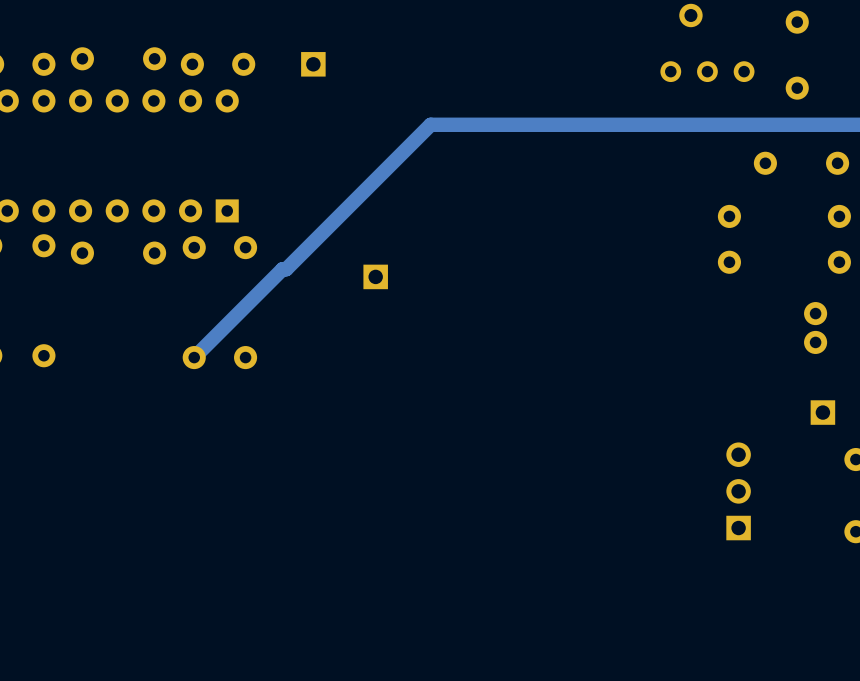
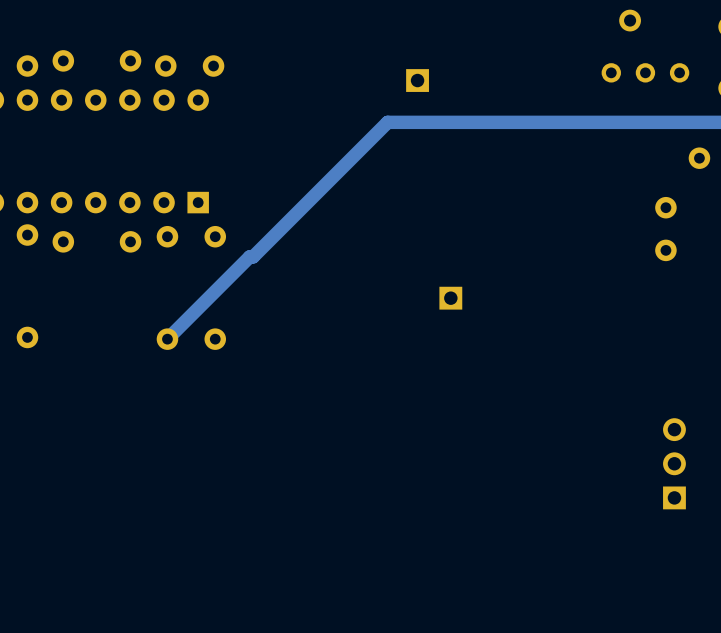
part: (313, 64) -> none
part: none -> (417, 80)
part: (375, 276) -> none
part: none -> (450, 298)

